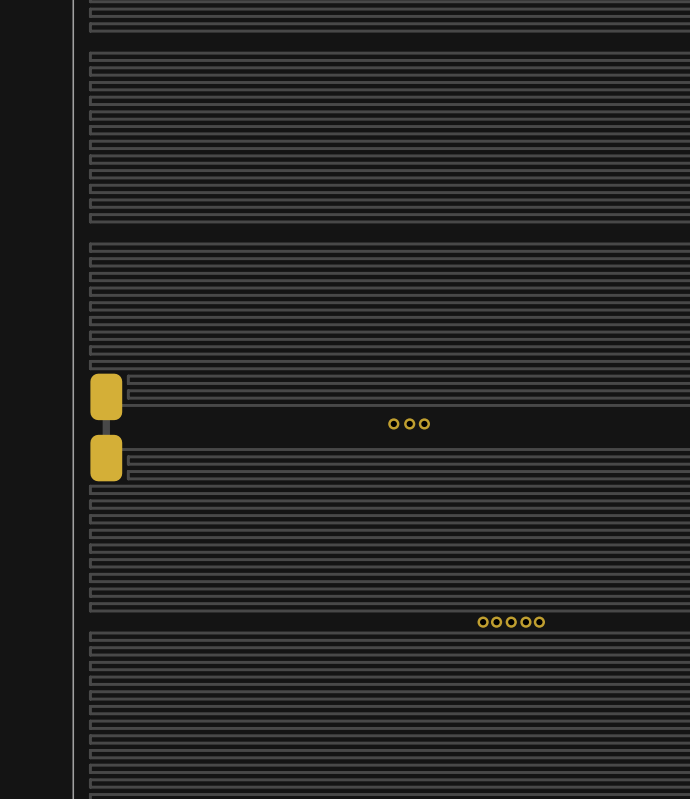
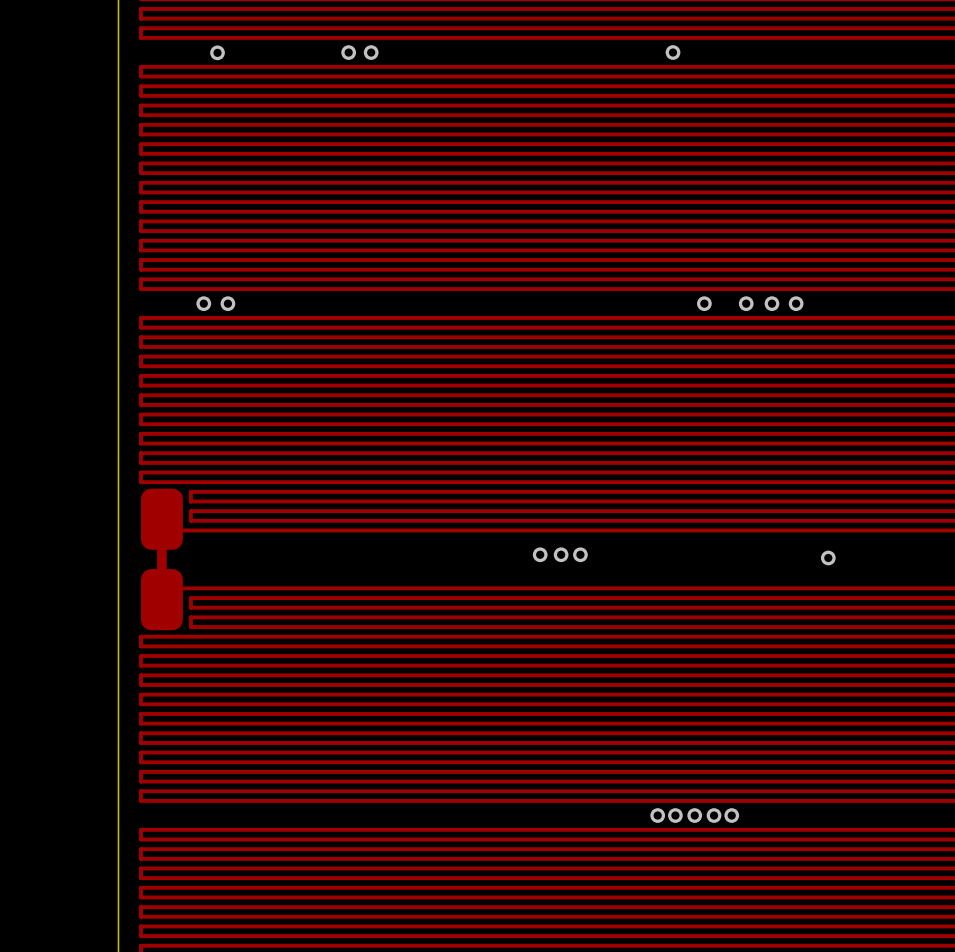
via: none -> (217, 52)
via: none -> (348, 52)
via: none -> (371, 52)
via: none -> (673, 52)
via: none -> (203, 303)
via: none -> (227, 303)
via: none -> (704, 303)
via: none -> (746, 303)
via: none -> (771, 303)
via: none -> (796, 303)
via: none -> (828, 557)

